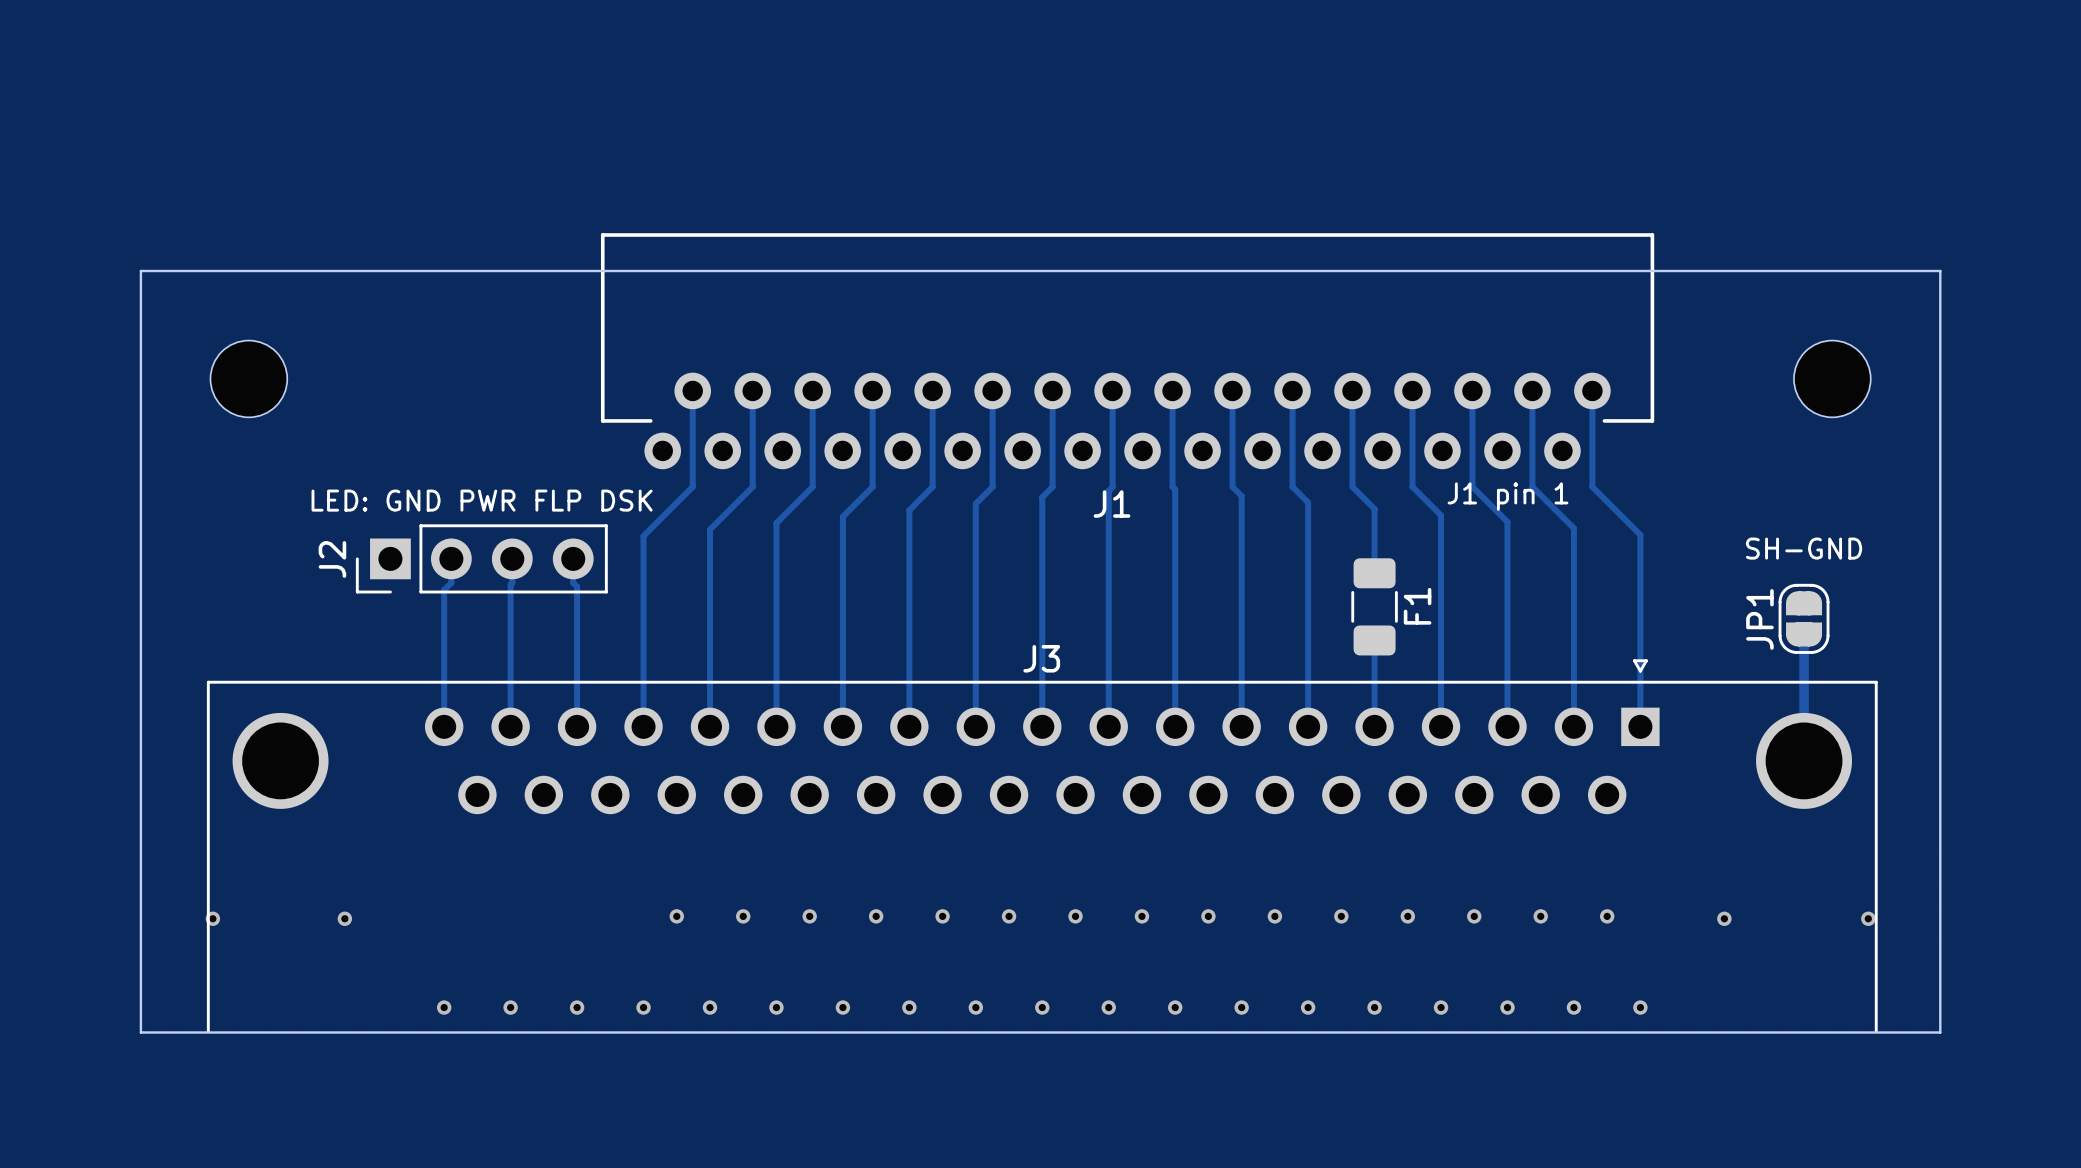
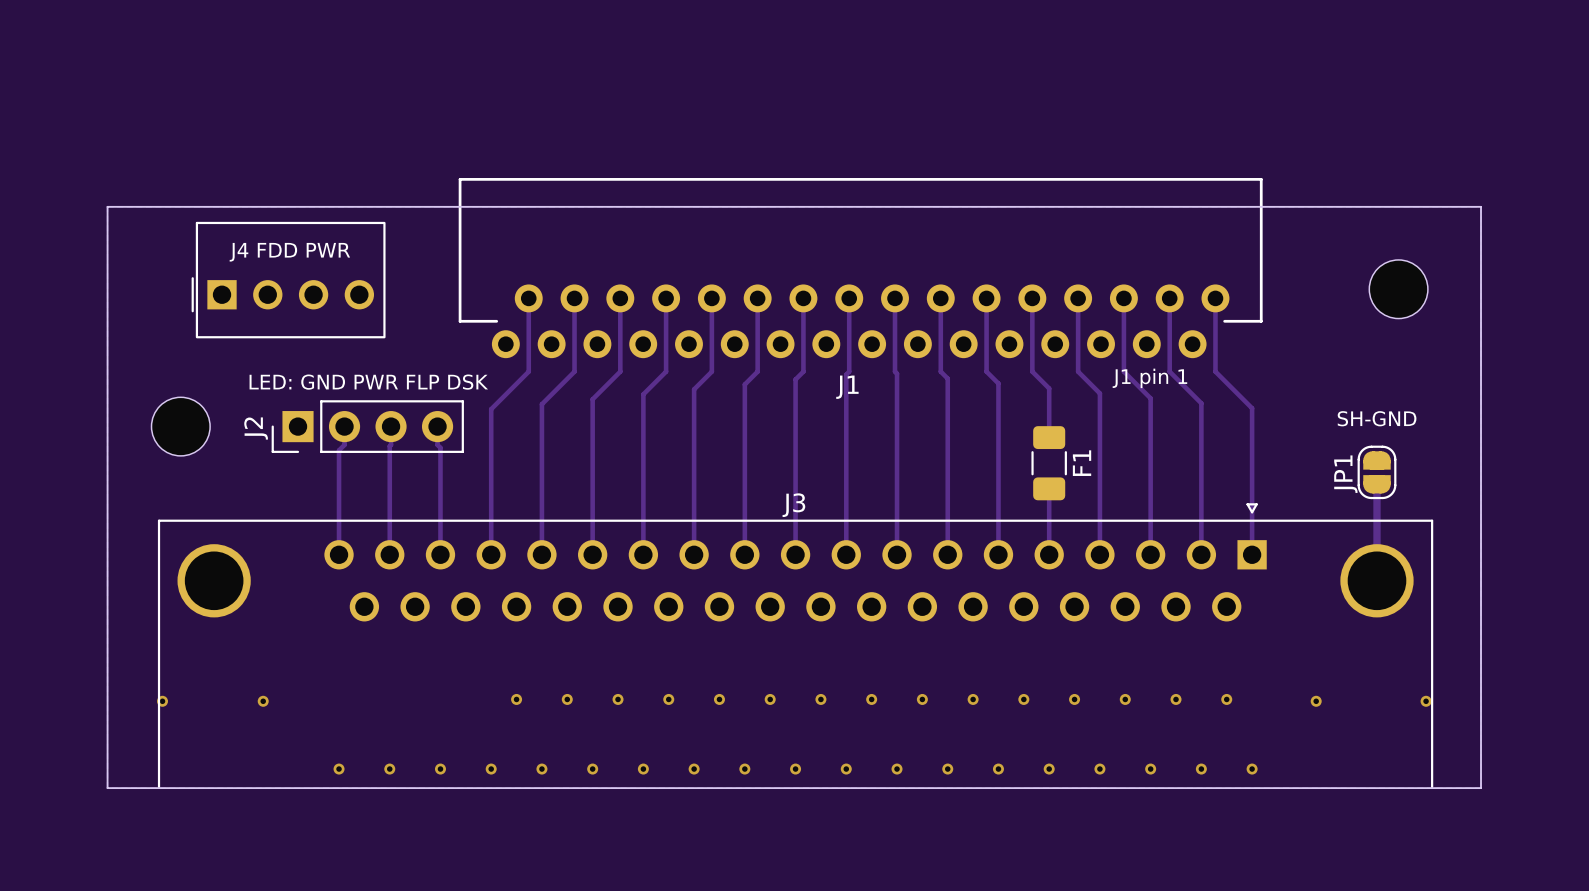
text: none -> J4 FDD PWR (289, 252)
part: none -> (288, 280)
part position: (248, 378) -> (180, 426)

